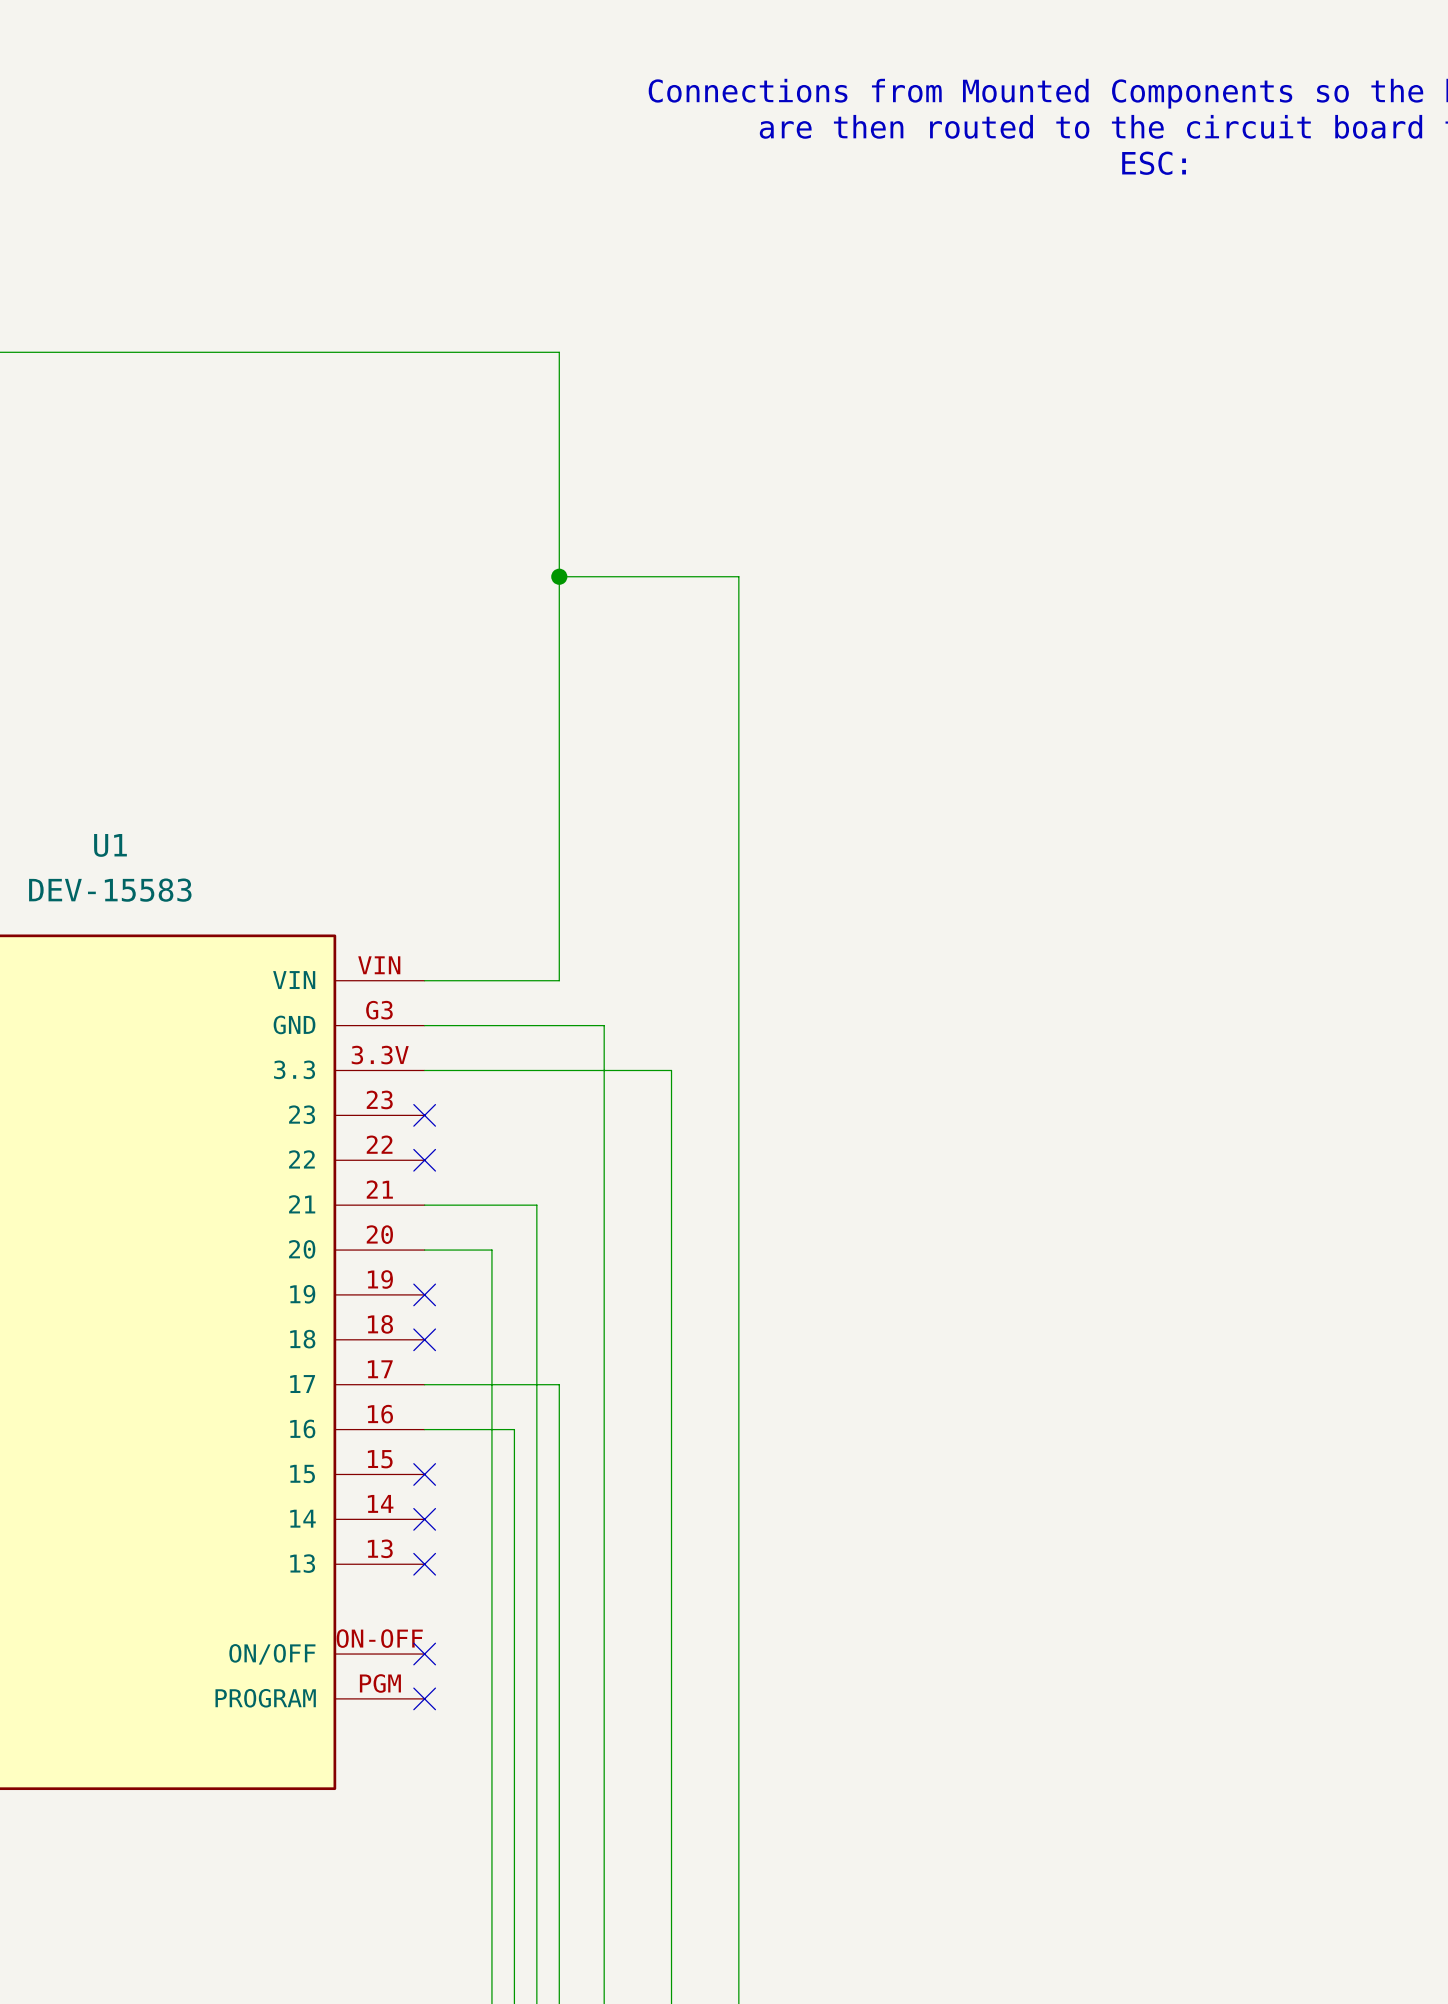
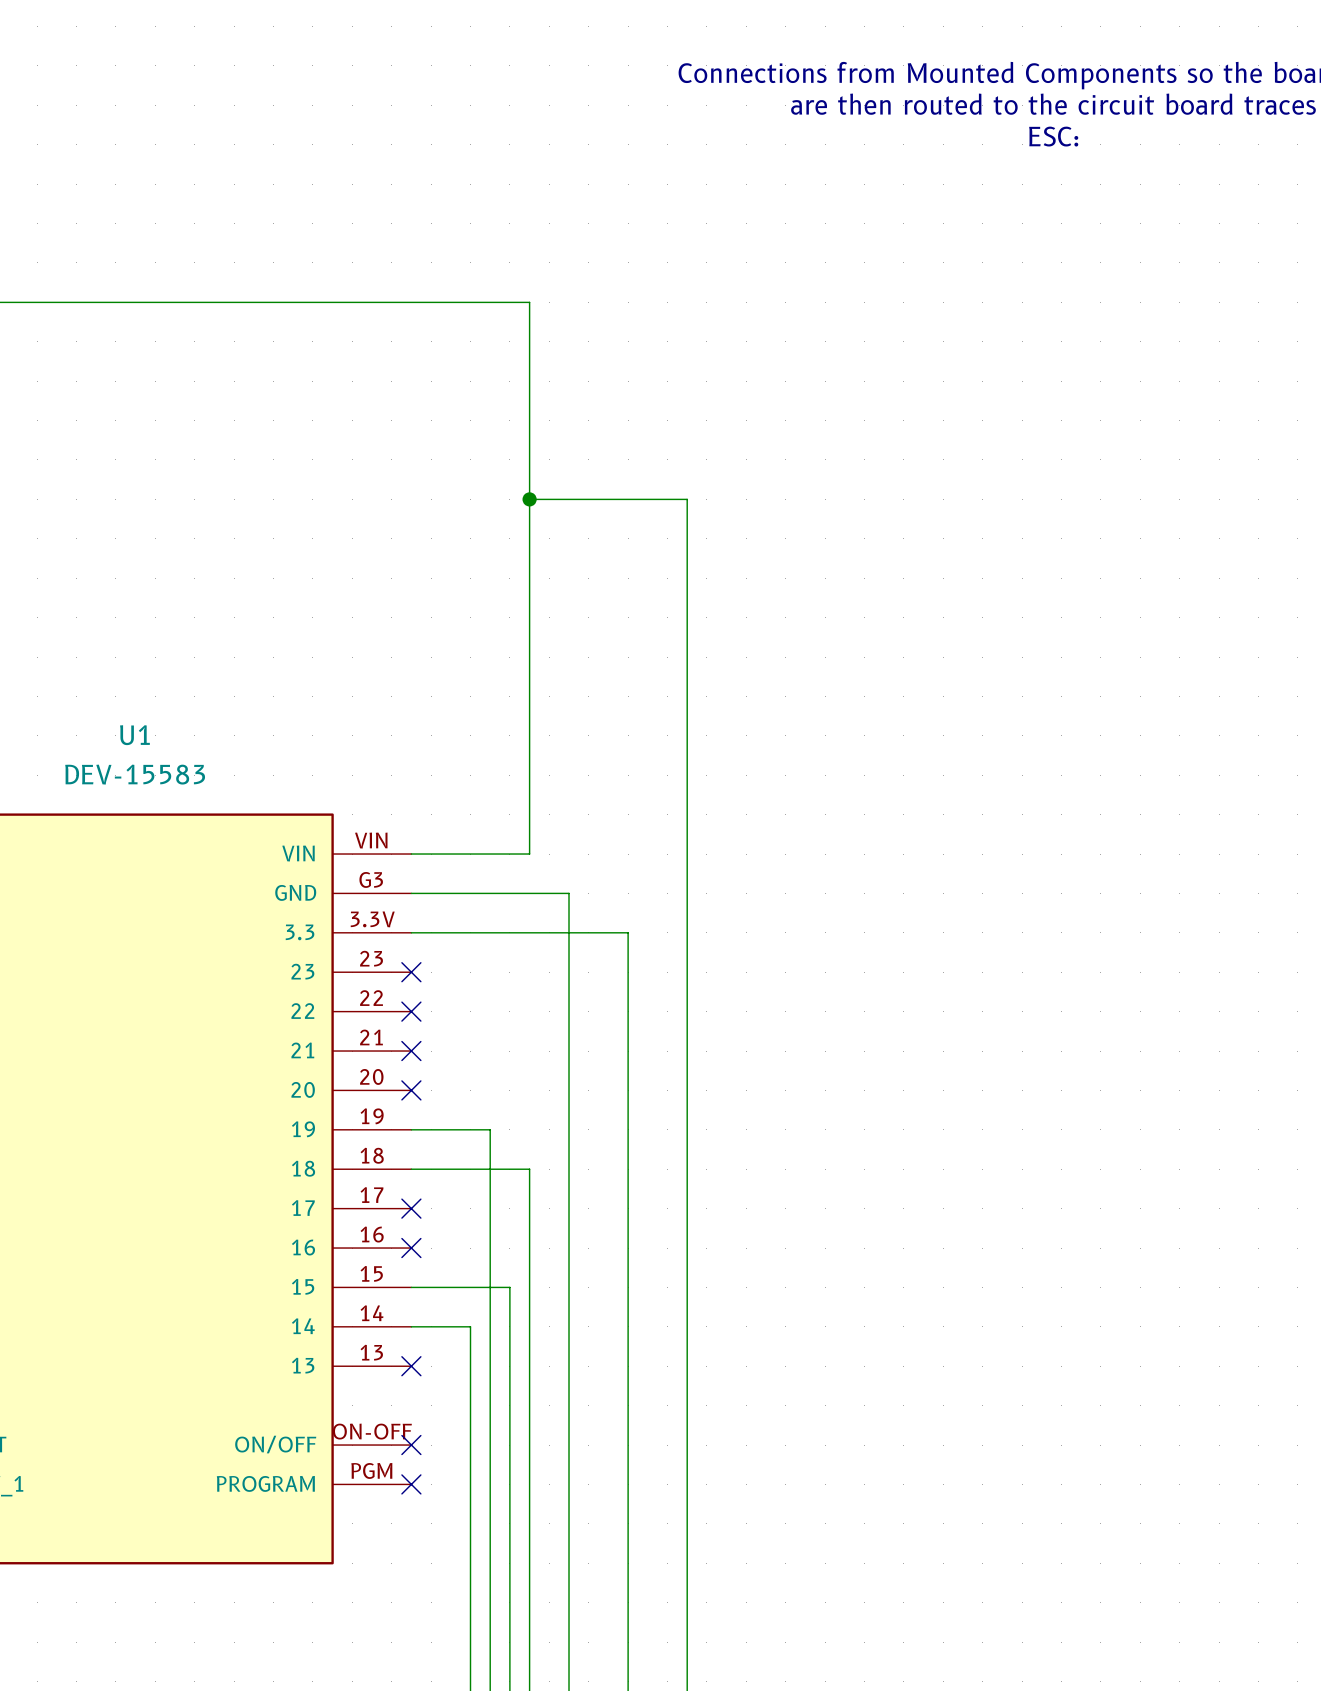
wire: (424, 1205) (536, 1205) (536, 1474) -> (411, 1287) (509, 1287)
no-connect mark: none -> (411, 1051)
wire: (424, 1250) (491, 1250) (491, 1519) -> (411, 1326) (470, 1326)
no-connect mark: none -> (411, 1090)
no-connect mark: (424, 1294) -> none
no-connect mark: (424, 1339) -> none
wire: (424, 1384) (559, 1384) -> (411, 1169) (529, 1169) (529, 1208)
no-connect mark: none -> (411, 1208)
wire: (424, 1429) (514, 1429) -> (411, 1129) (490, 1129) (490, 1248)
no-connect mark: none -> (411, 1248)
no-connect mark: (424, 1474) -> none
no-connect mark: (424, 1519) -> none

